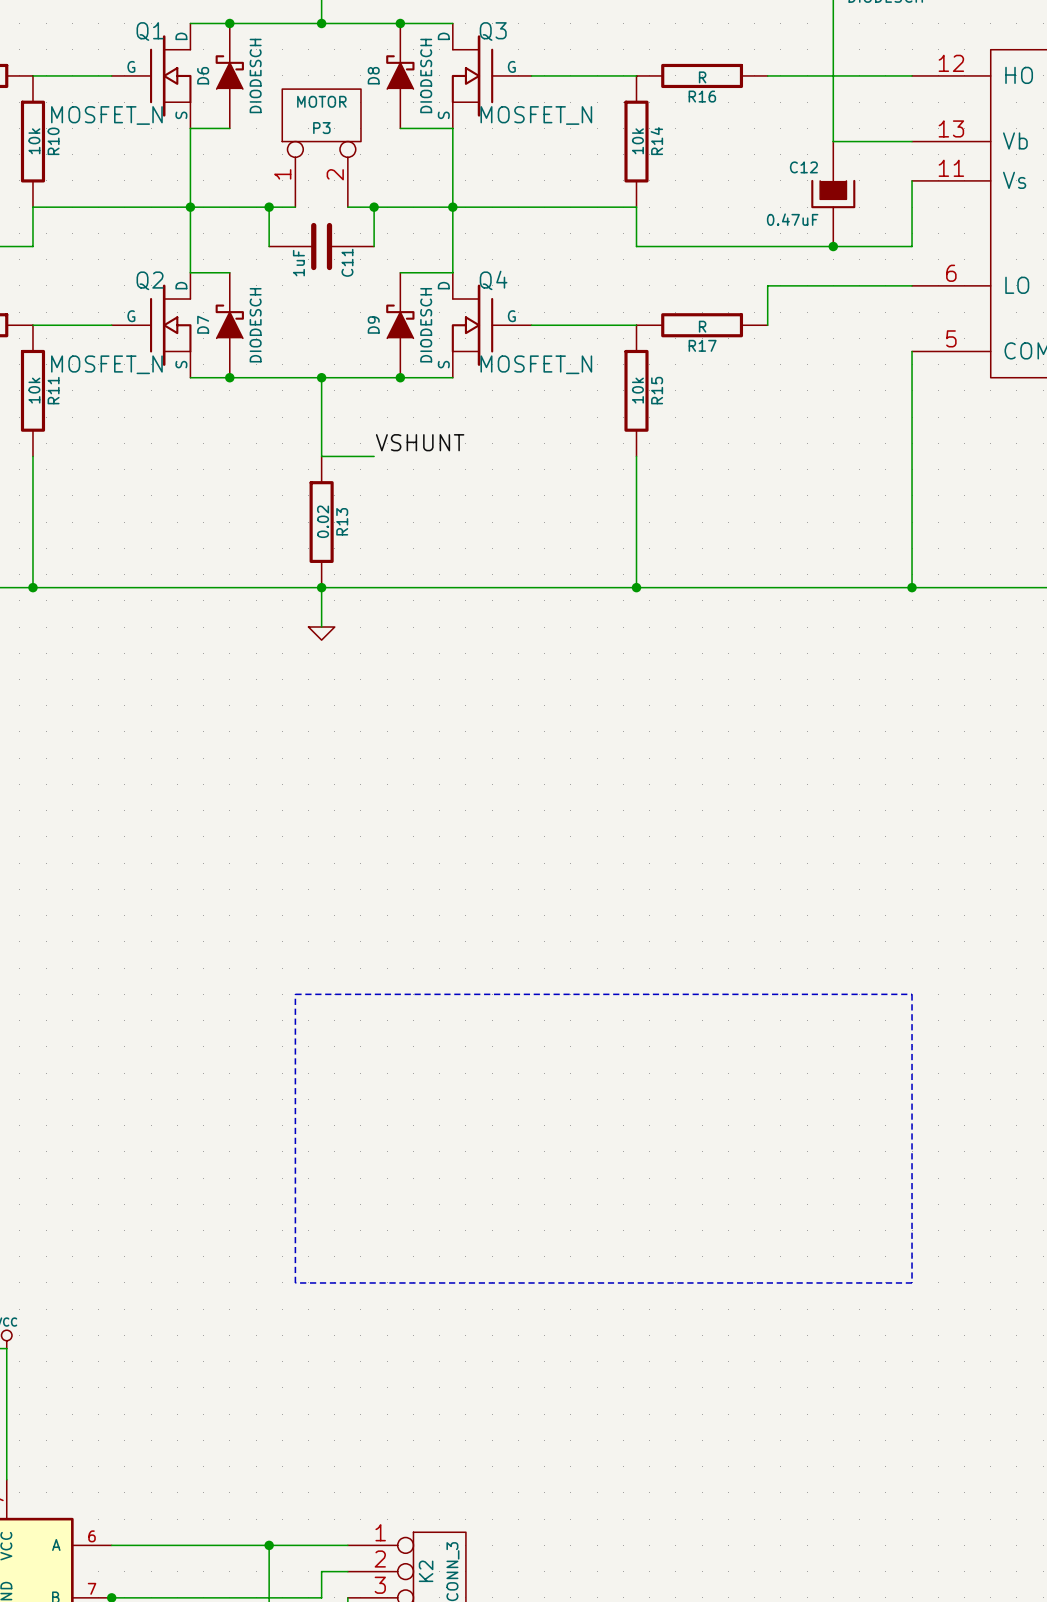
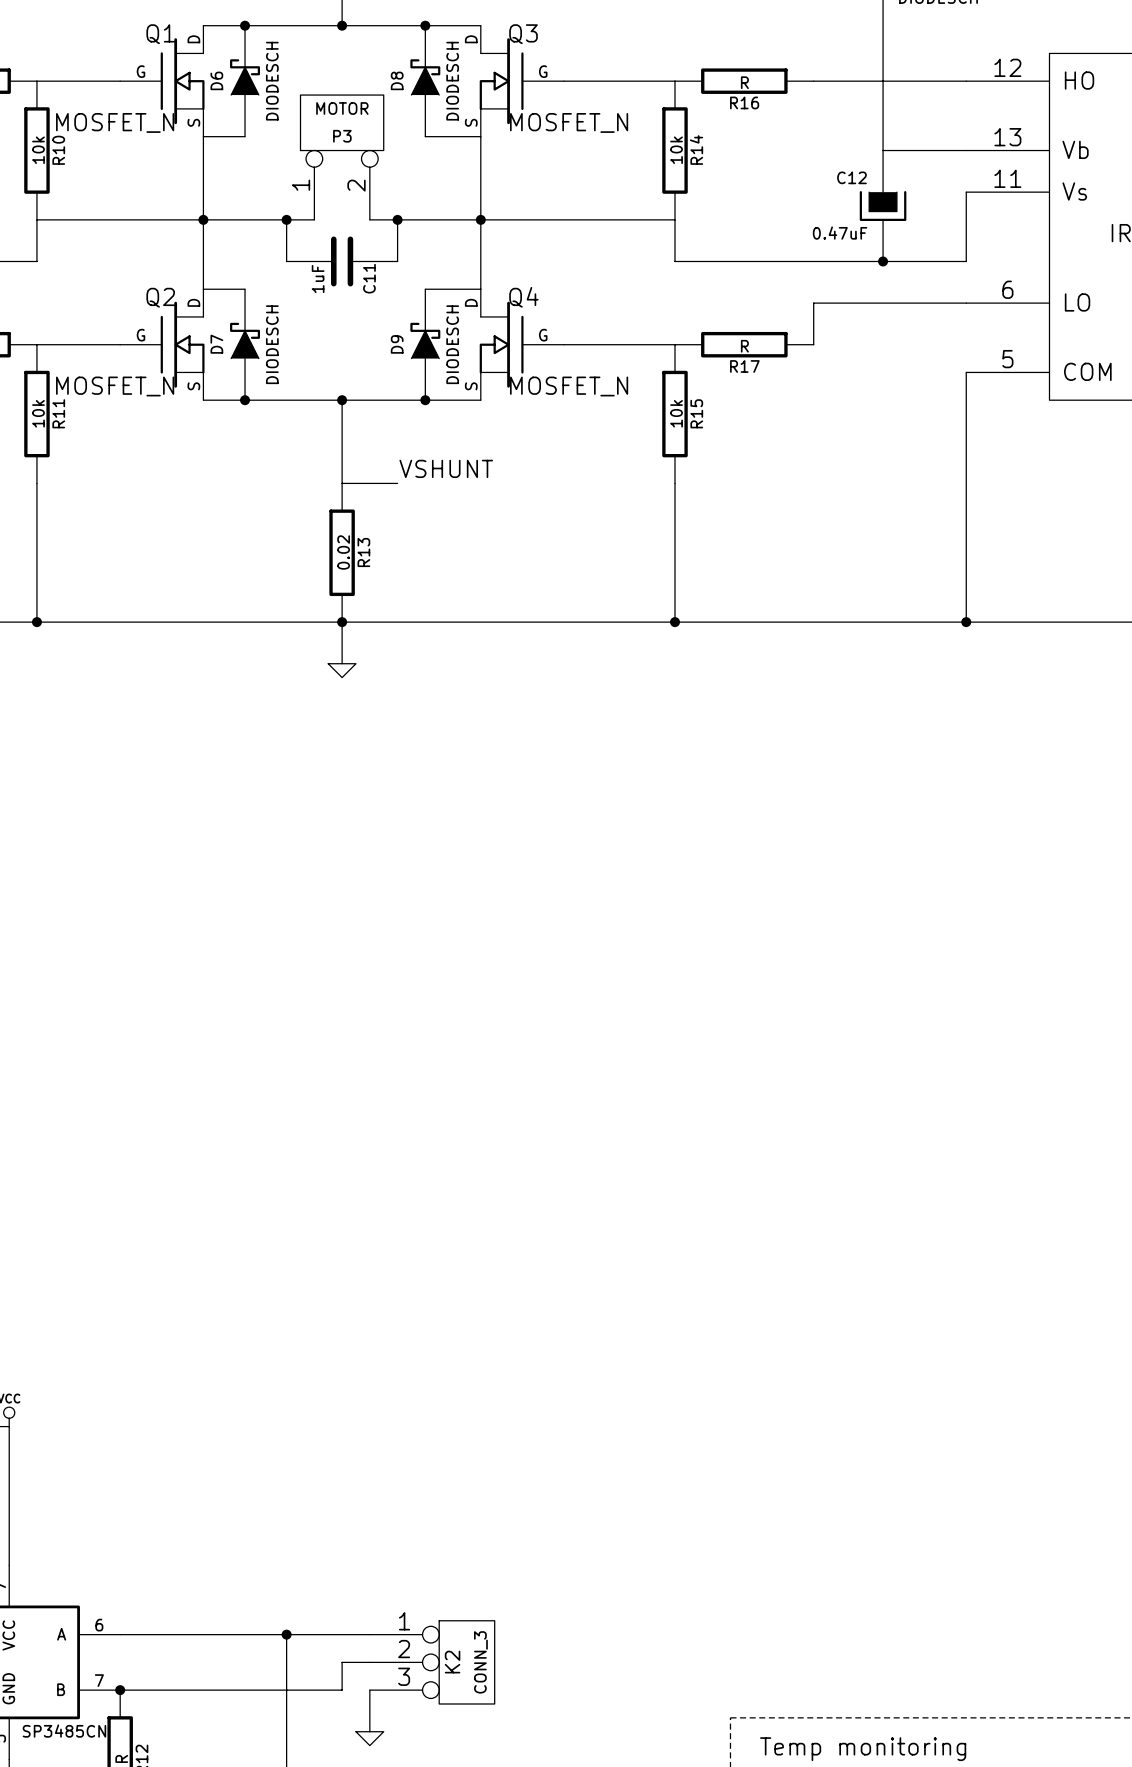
line: (295, 994) (912, 994) (912, 1282) (295, 1282) (295, 994) -> none

